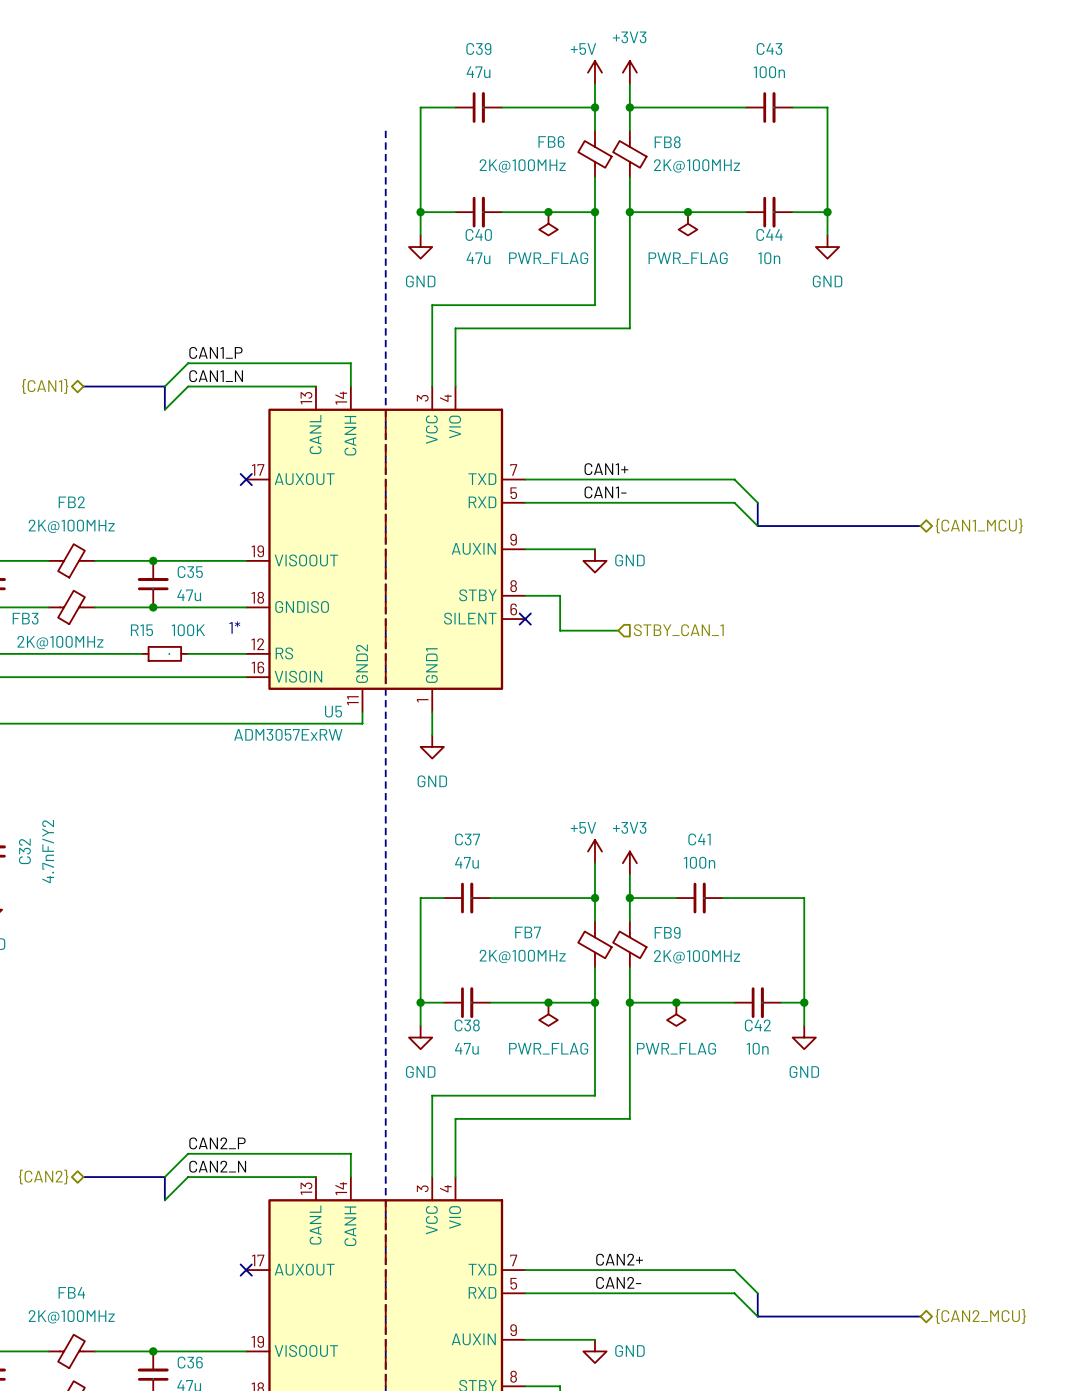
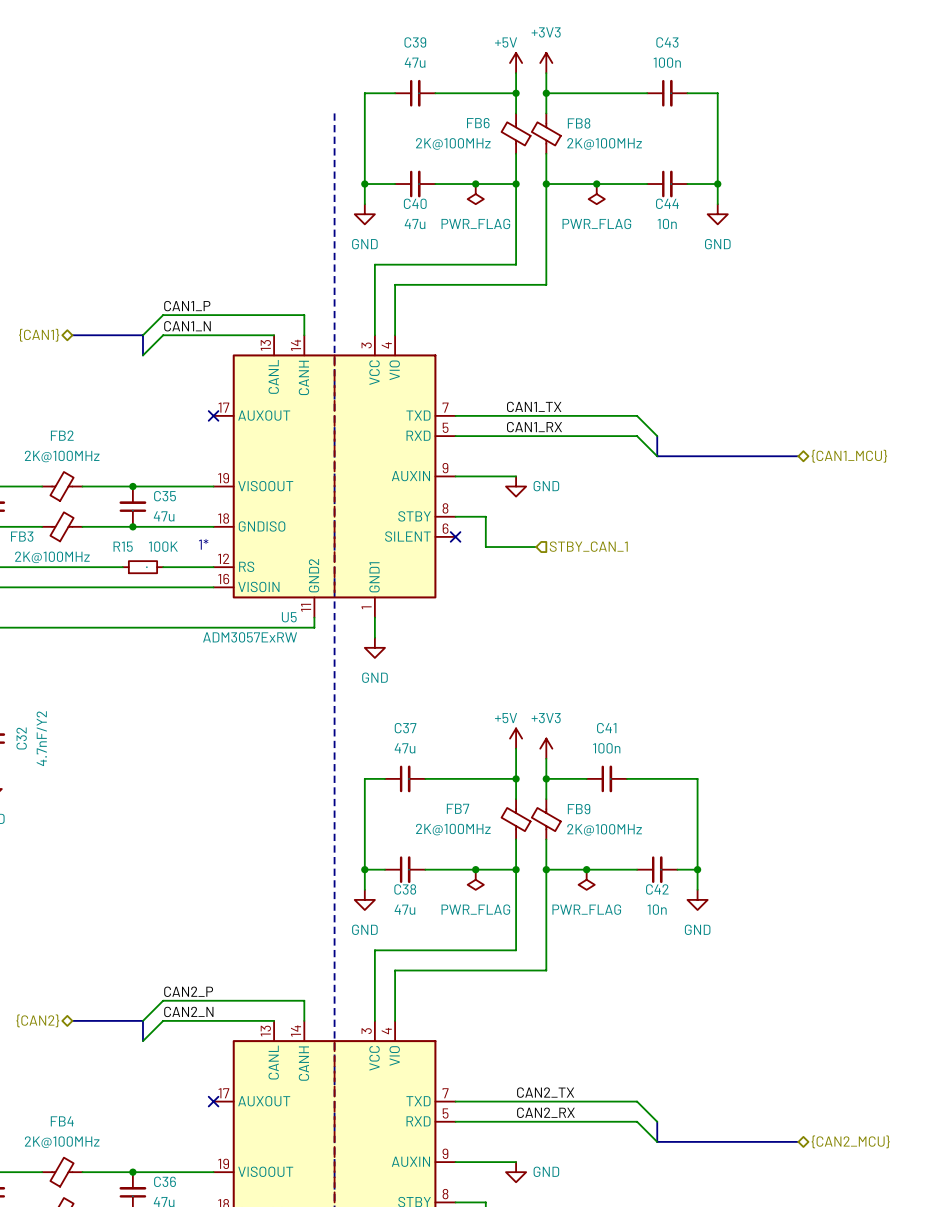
label: CAN1+ (606, 469) -> CAN1_TX (534, 406)
label: CAN1- (605, 492) -> CAN1_RX (534, 427)
label: CAN2+ (619, 1259) -> CAN2_TX (545, 1092)
label: CAN2- (618, 1282) -> CAN2_RX (545, 1112)

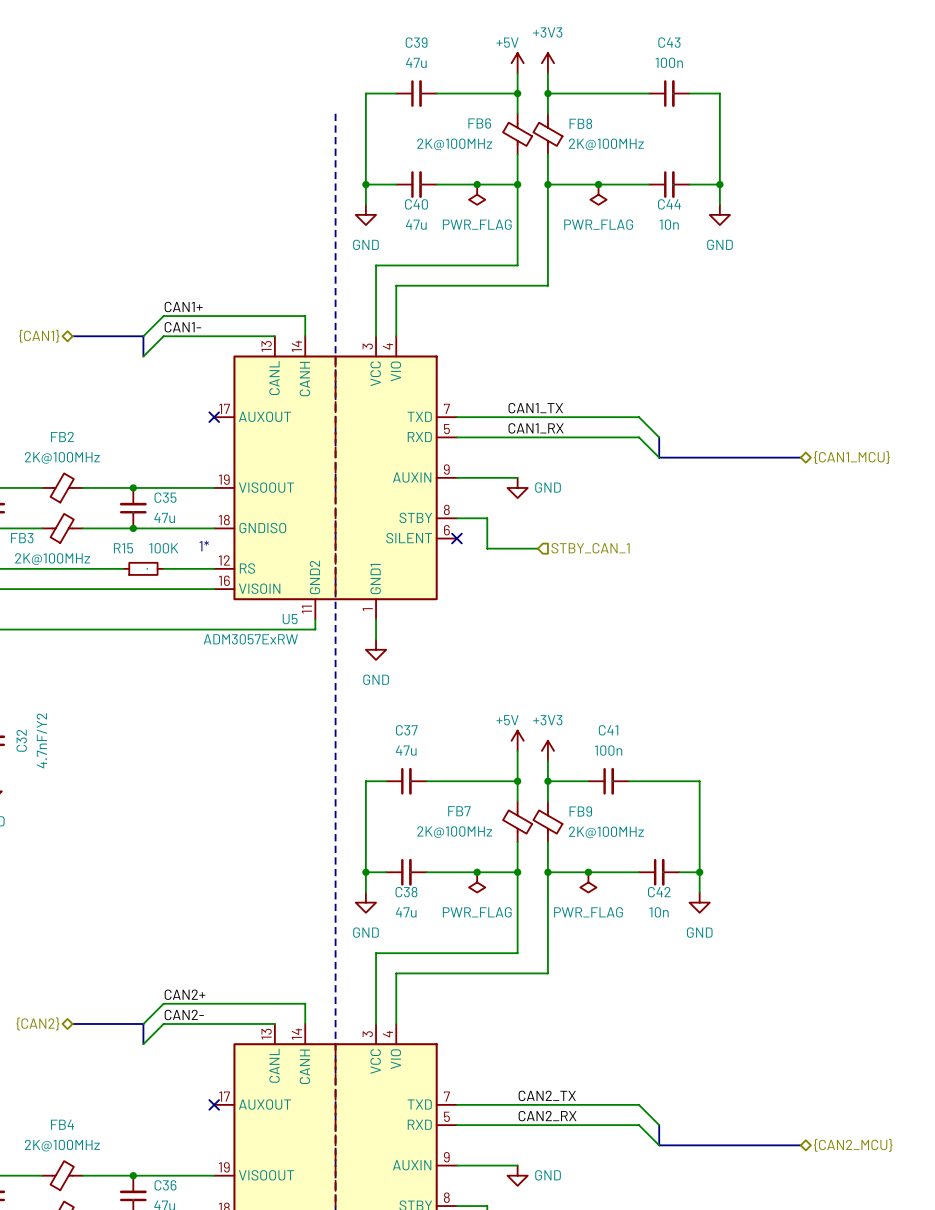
label: CAN1_P (187, 306) -> CAN1+ (183, 307)
label: CAN1_N (187, 326) -> CAN1- (182, 327)
label: CAN2_P (188, 991) -> CAN2+ (185, 994)
label: CAN2_N (188, 1011) -> CAN2- (184, 1014)

